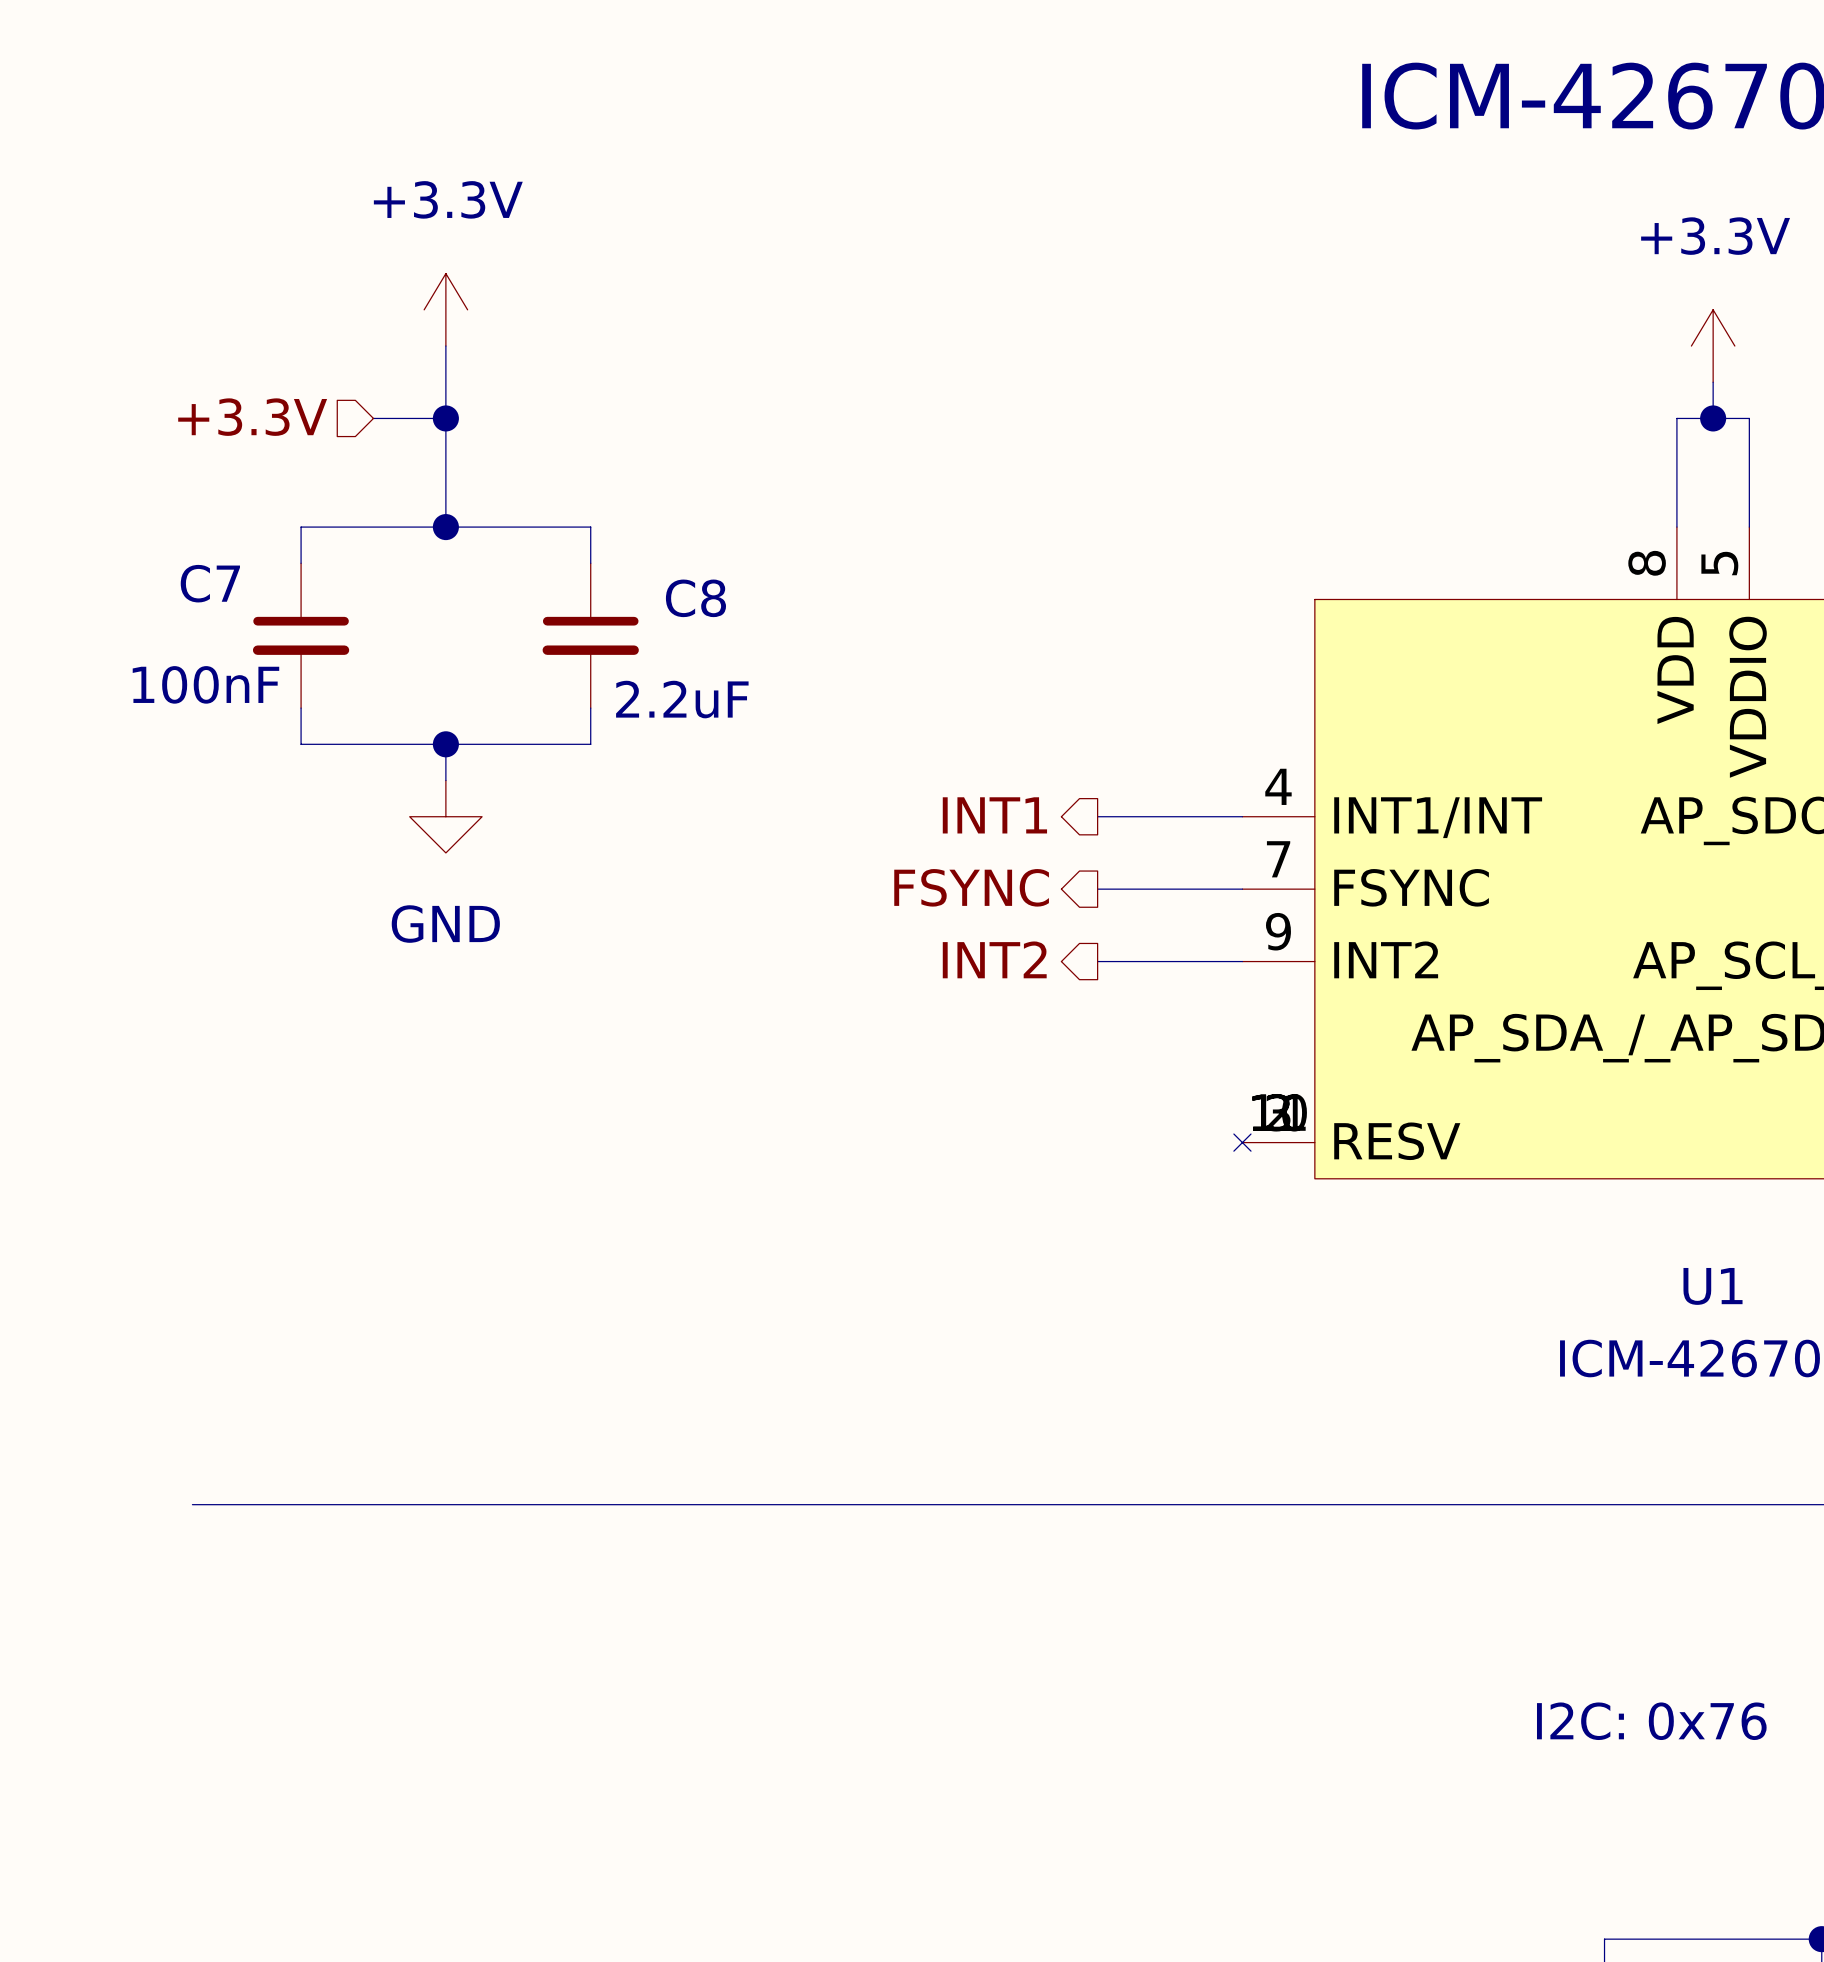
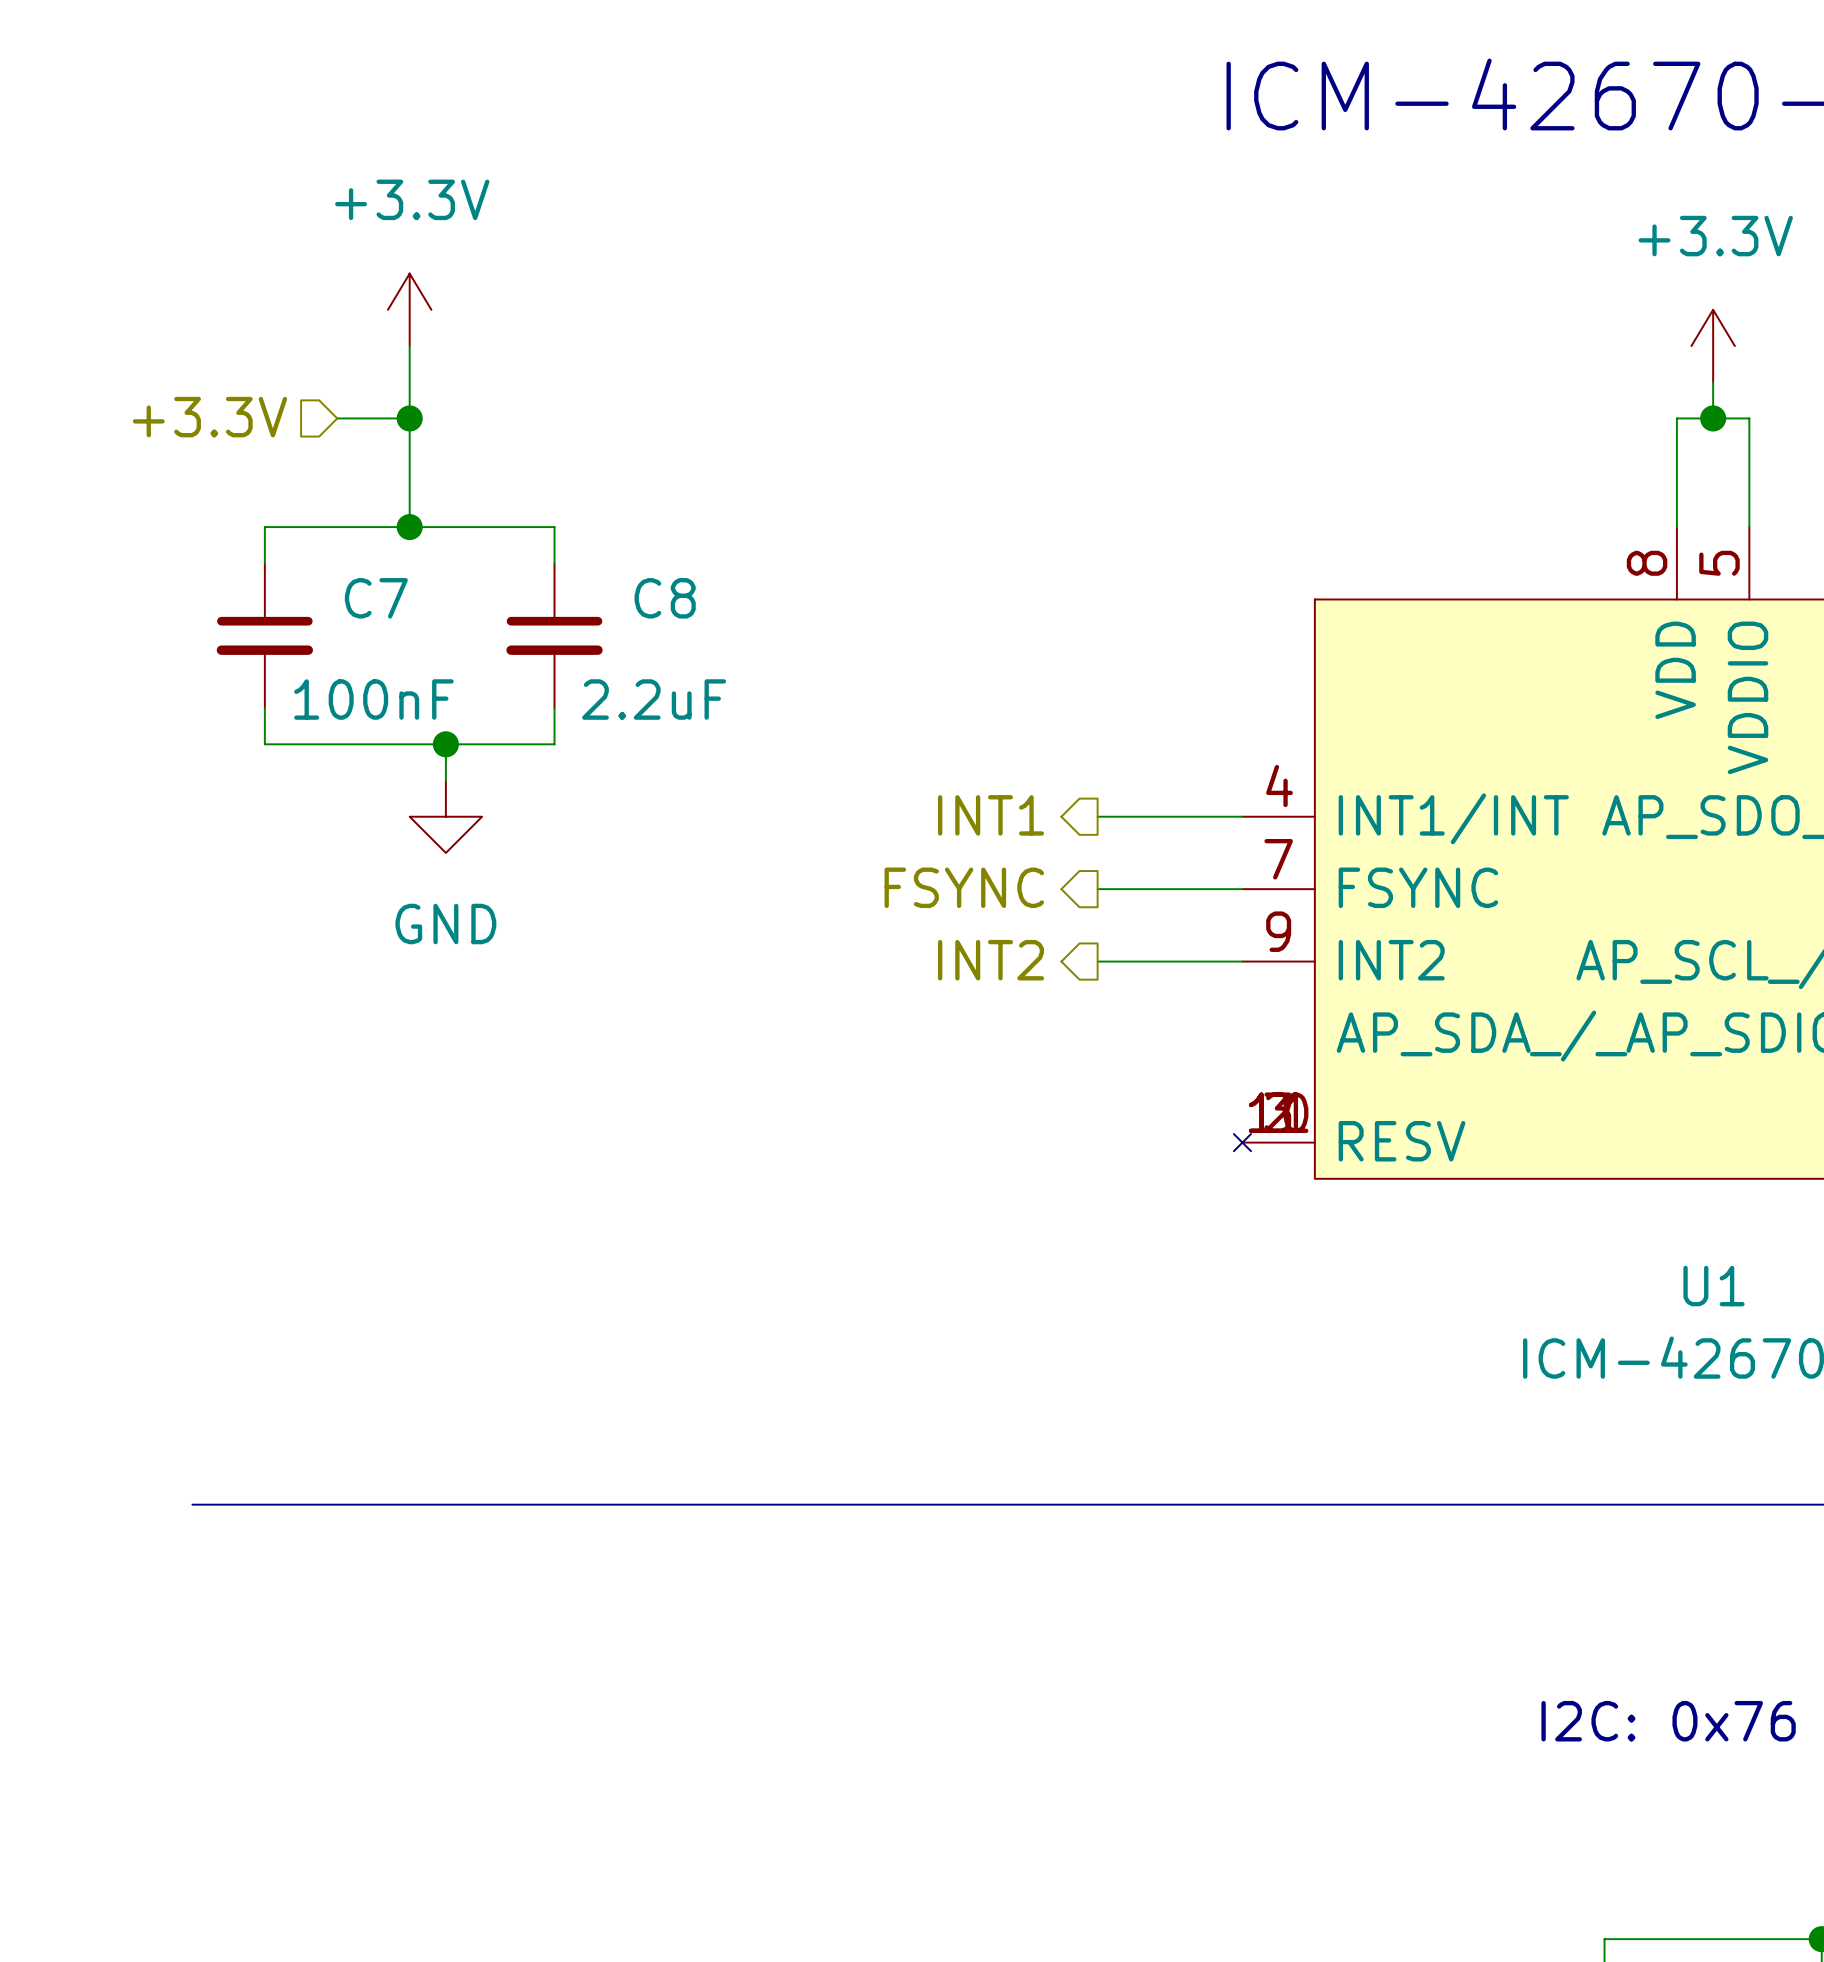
power symbol position: +3.3V (445, 309) -> +3.3V (409, 309)
wire: (445, 346) (445, 527) -> (409, 346) (409, 527)
hierarchical label position: +3.3V (252, 417) -> +3.3V (209, 417)
wire: (409, 418) (445, 418) -> (337, 418) (373, 418)
junction position: (445, 418) -> (409, 418)
wire: (301, 527) (301, 563) -> (301, 527) (264, 527) (264, 563)
junction position: (445, 527) -> (409, 527)
wire: (554, 527) (590, 527) (590, 563) -> (554, 527) (554, 563)
C7 name position: C7 (210, 583) -> C7 (376, 598)
C7 position: (301, 635) -> (264, 635)
C8 position: (590, 635) -> (554, 635)
C7 value position: 100nF (205, 684) -> 100nF (373, 699)
wire: (301, 708) (301, 744) -> (264, 708) (264, 744) (301, 744)
wire: (590, 708) (590, 744) (554, 744) -> (554, 708) (554, 744)

